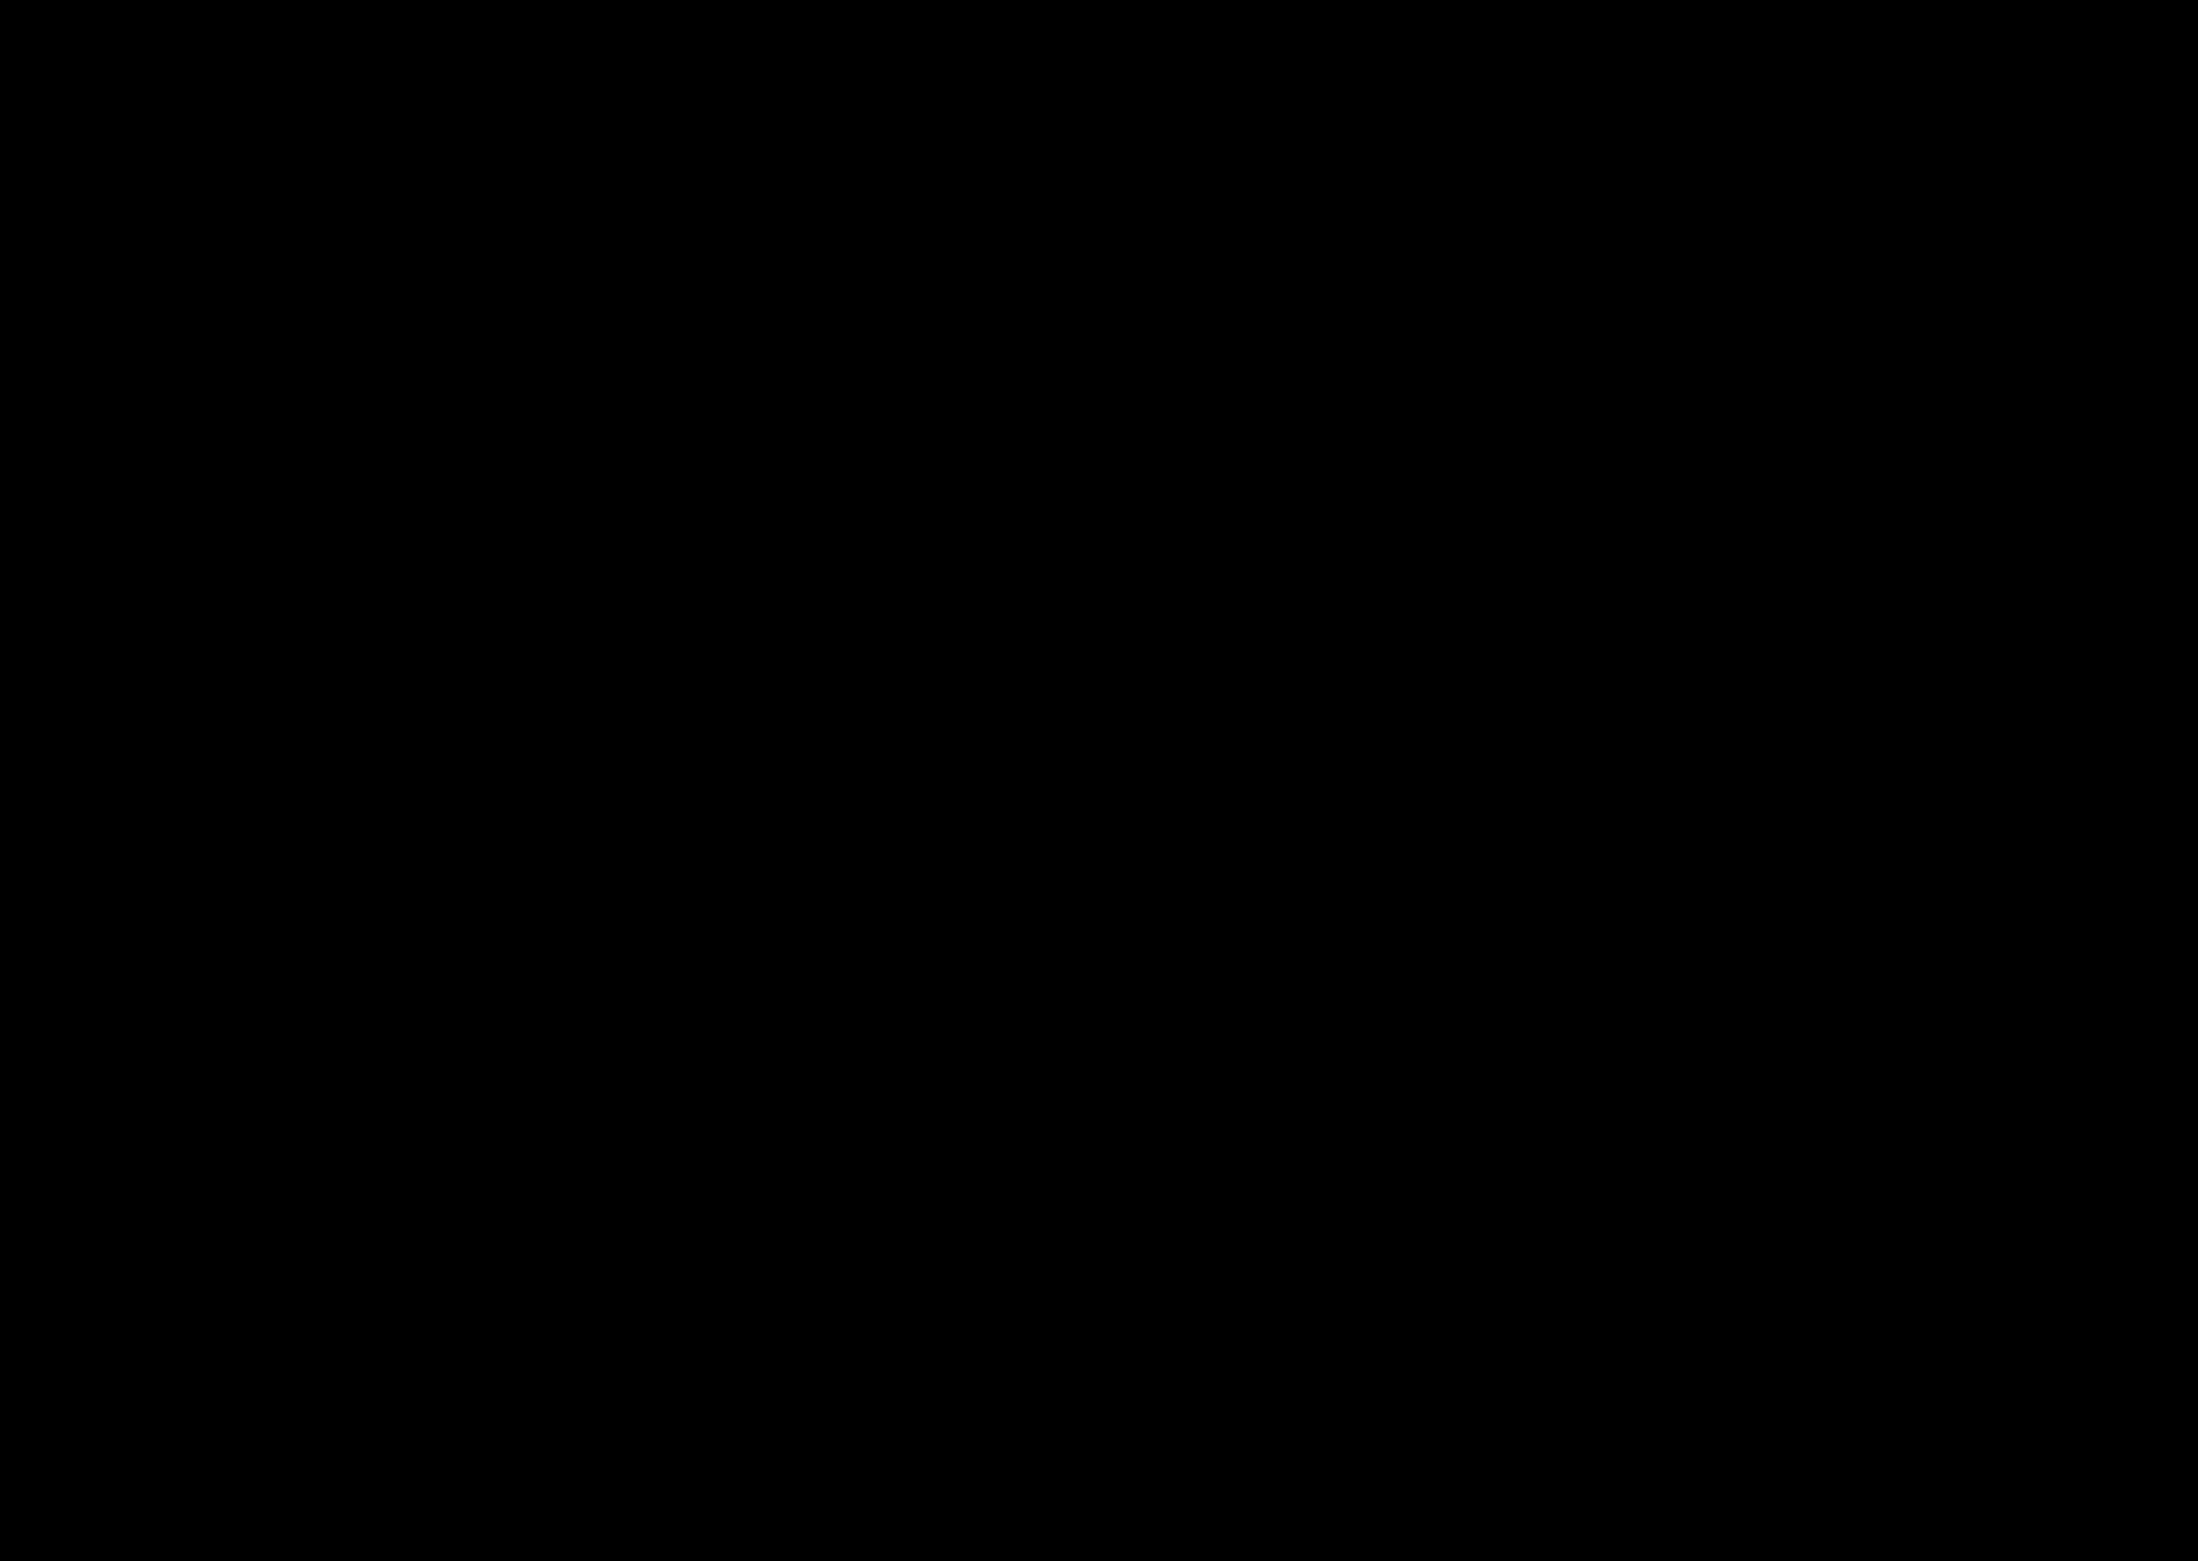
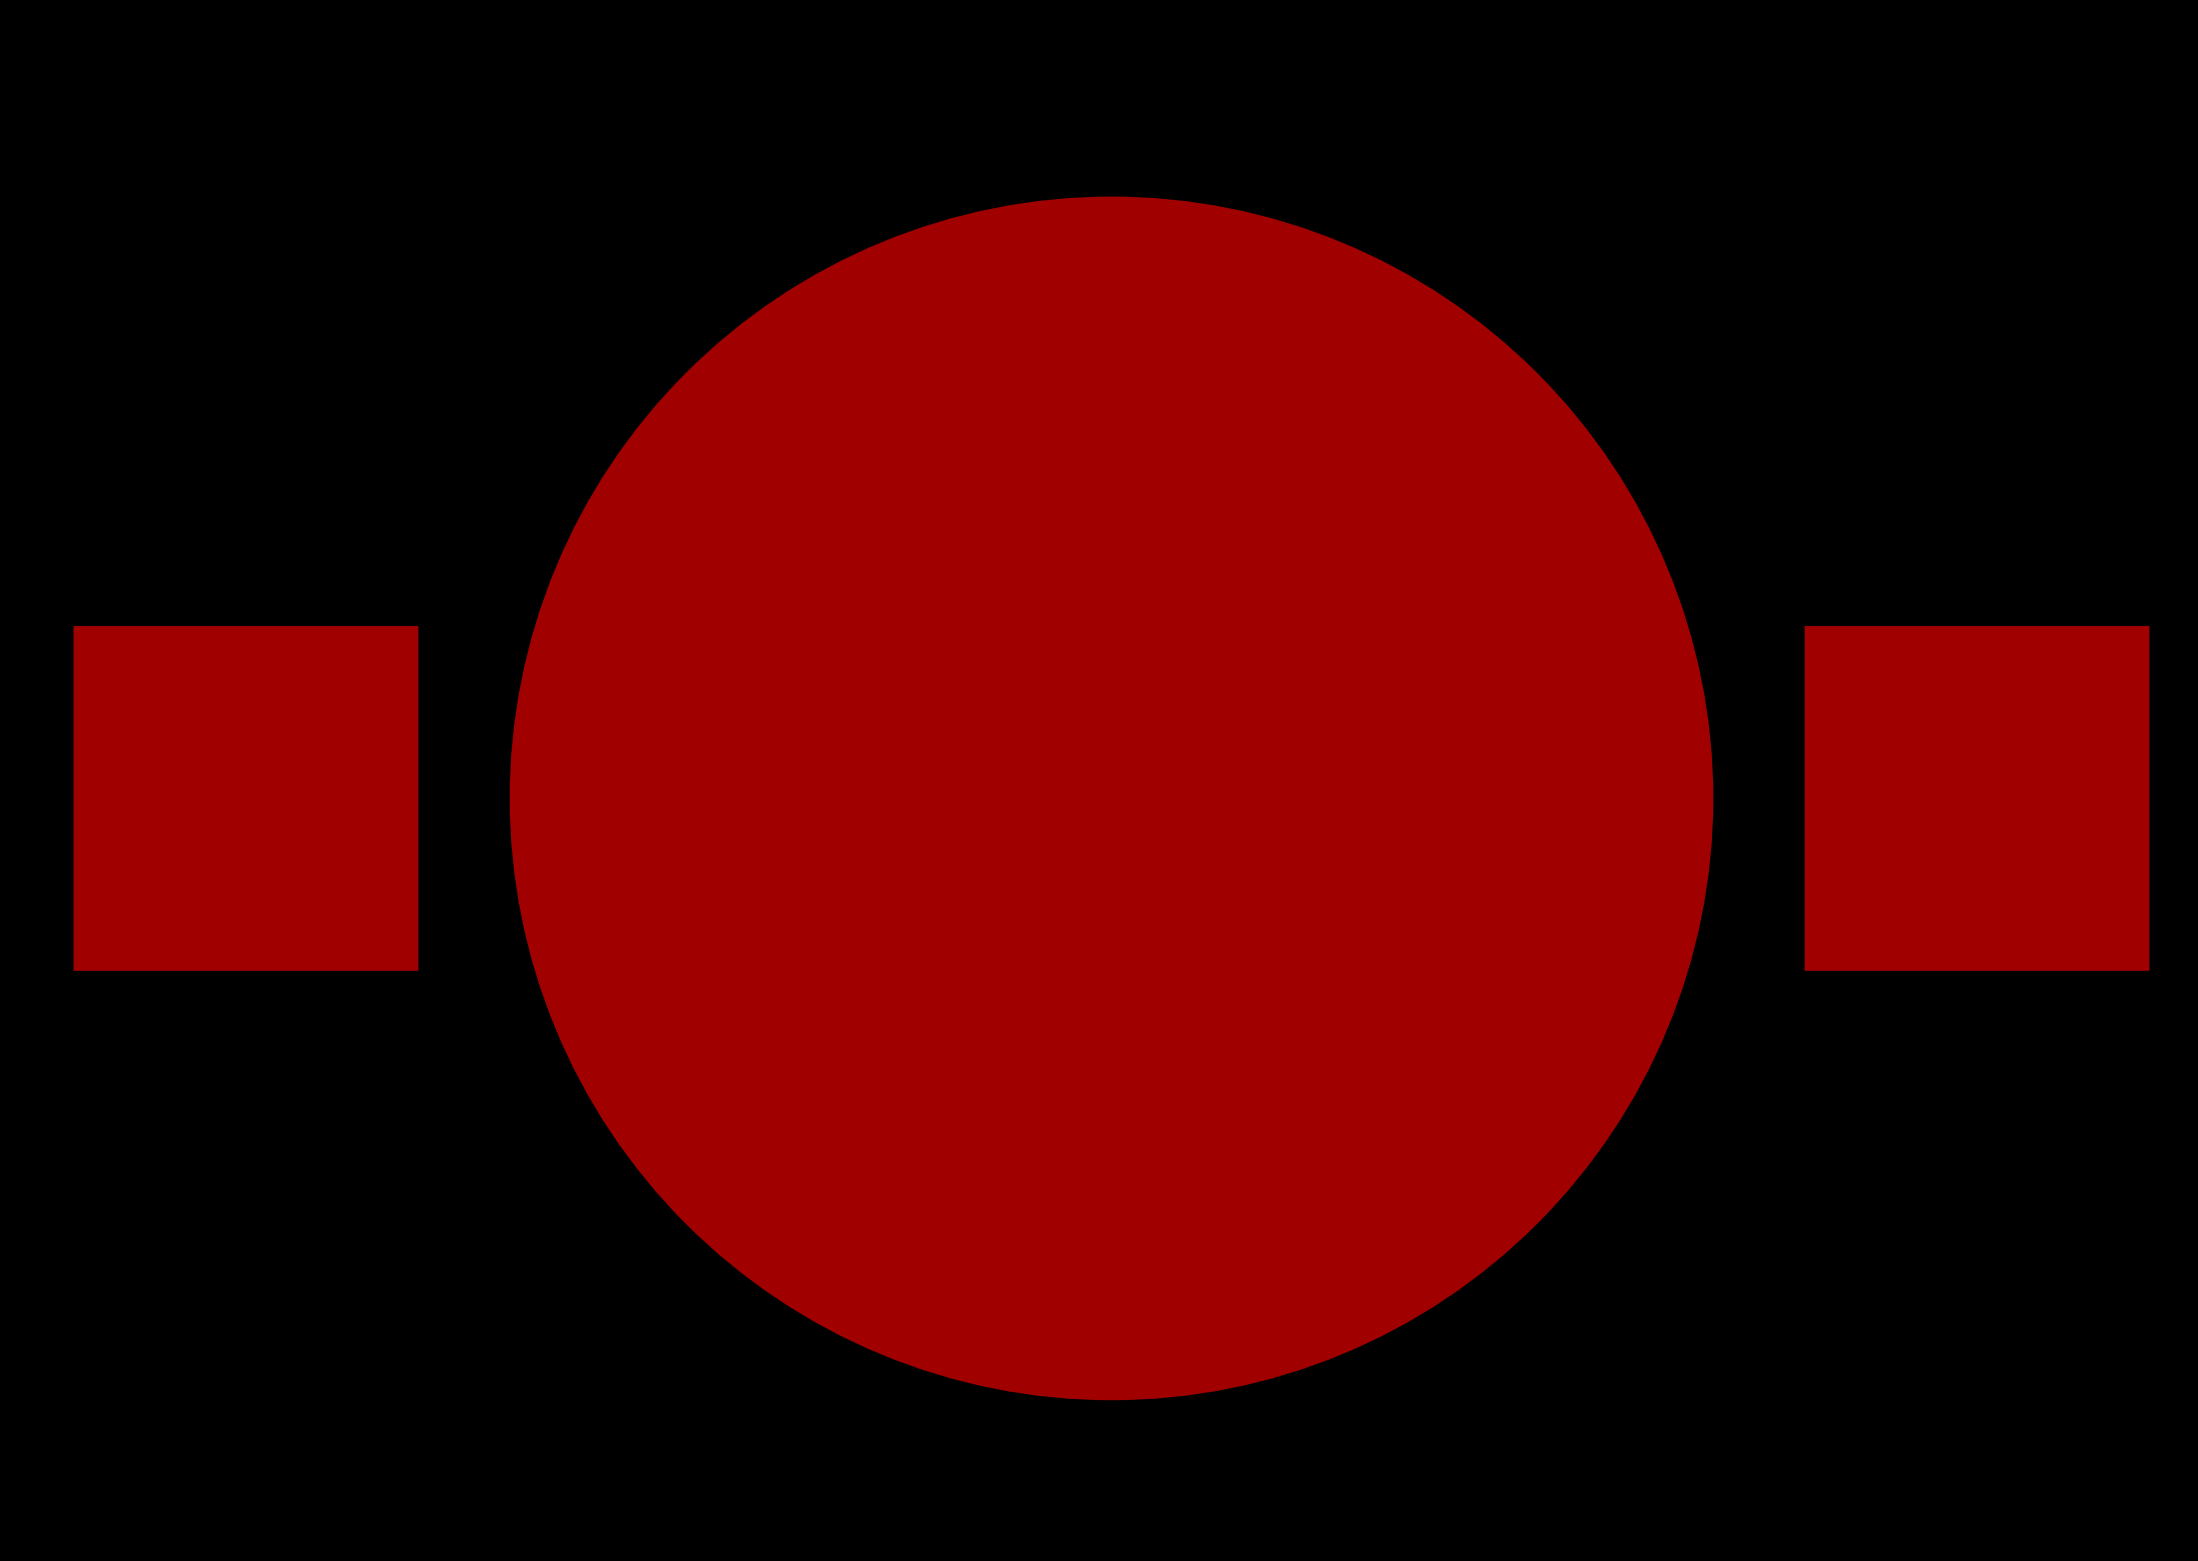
part: none -> (1111, 798)

